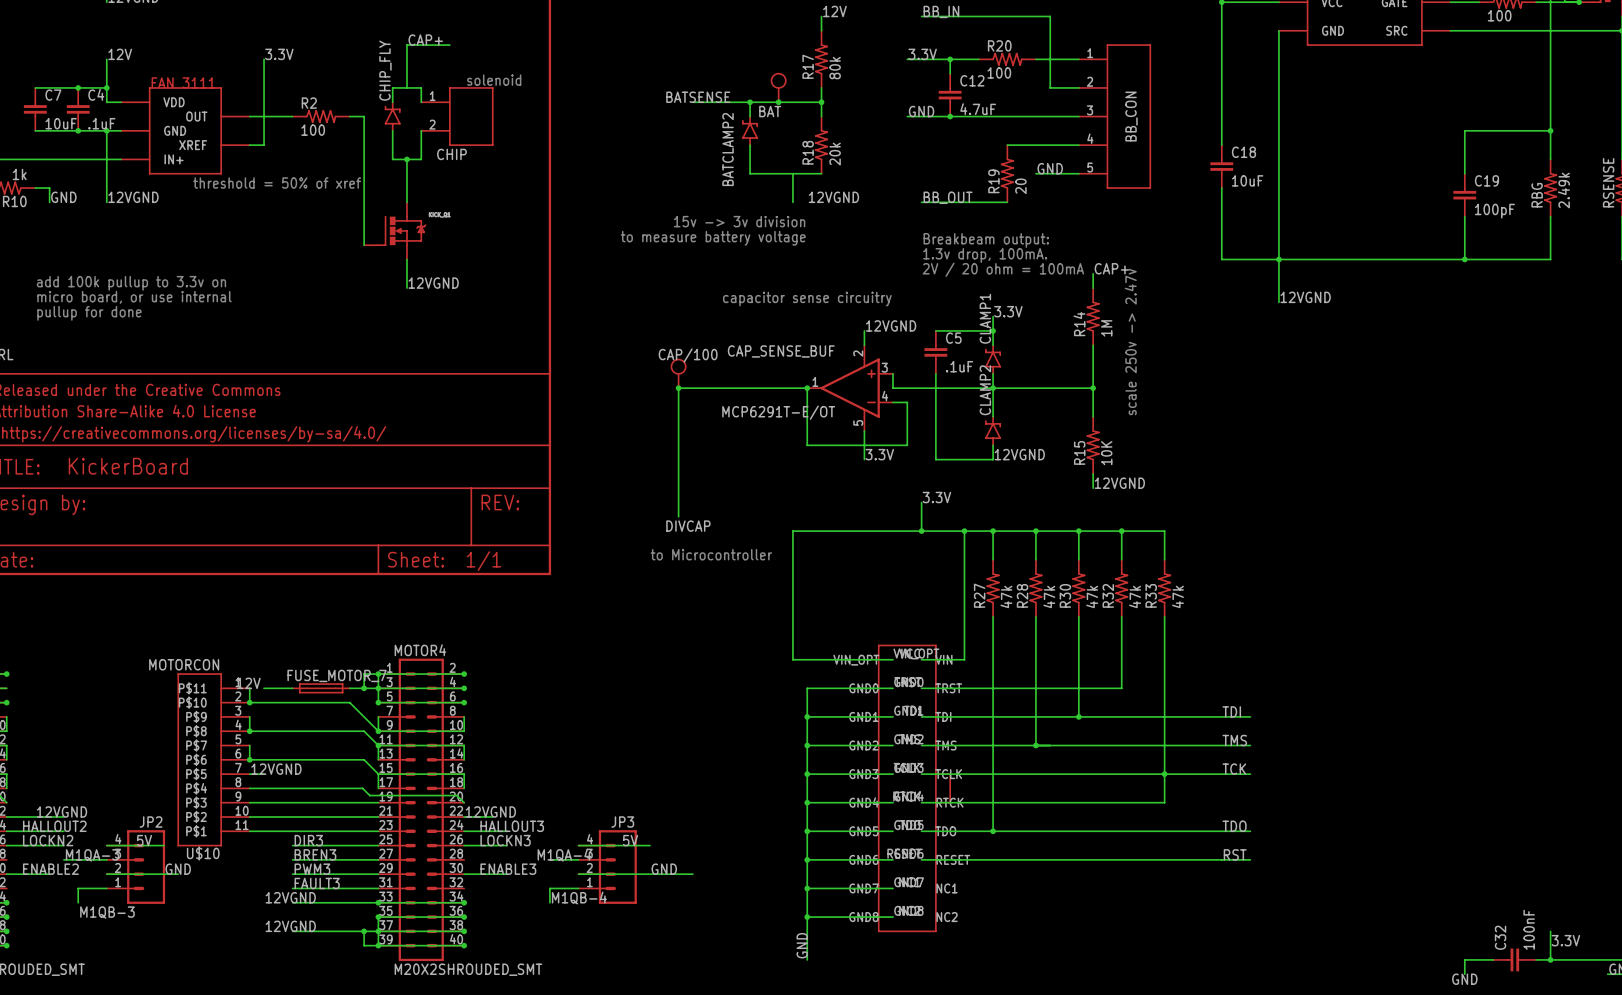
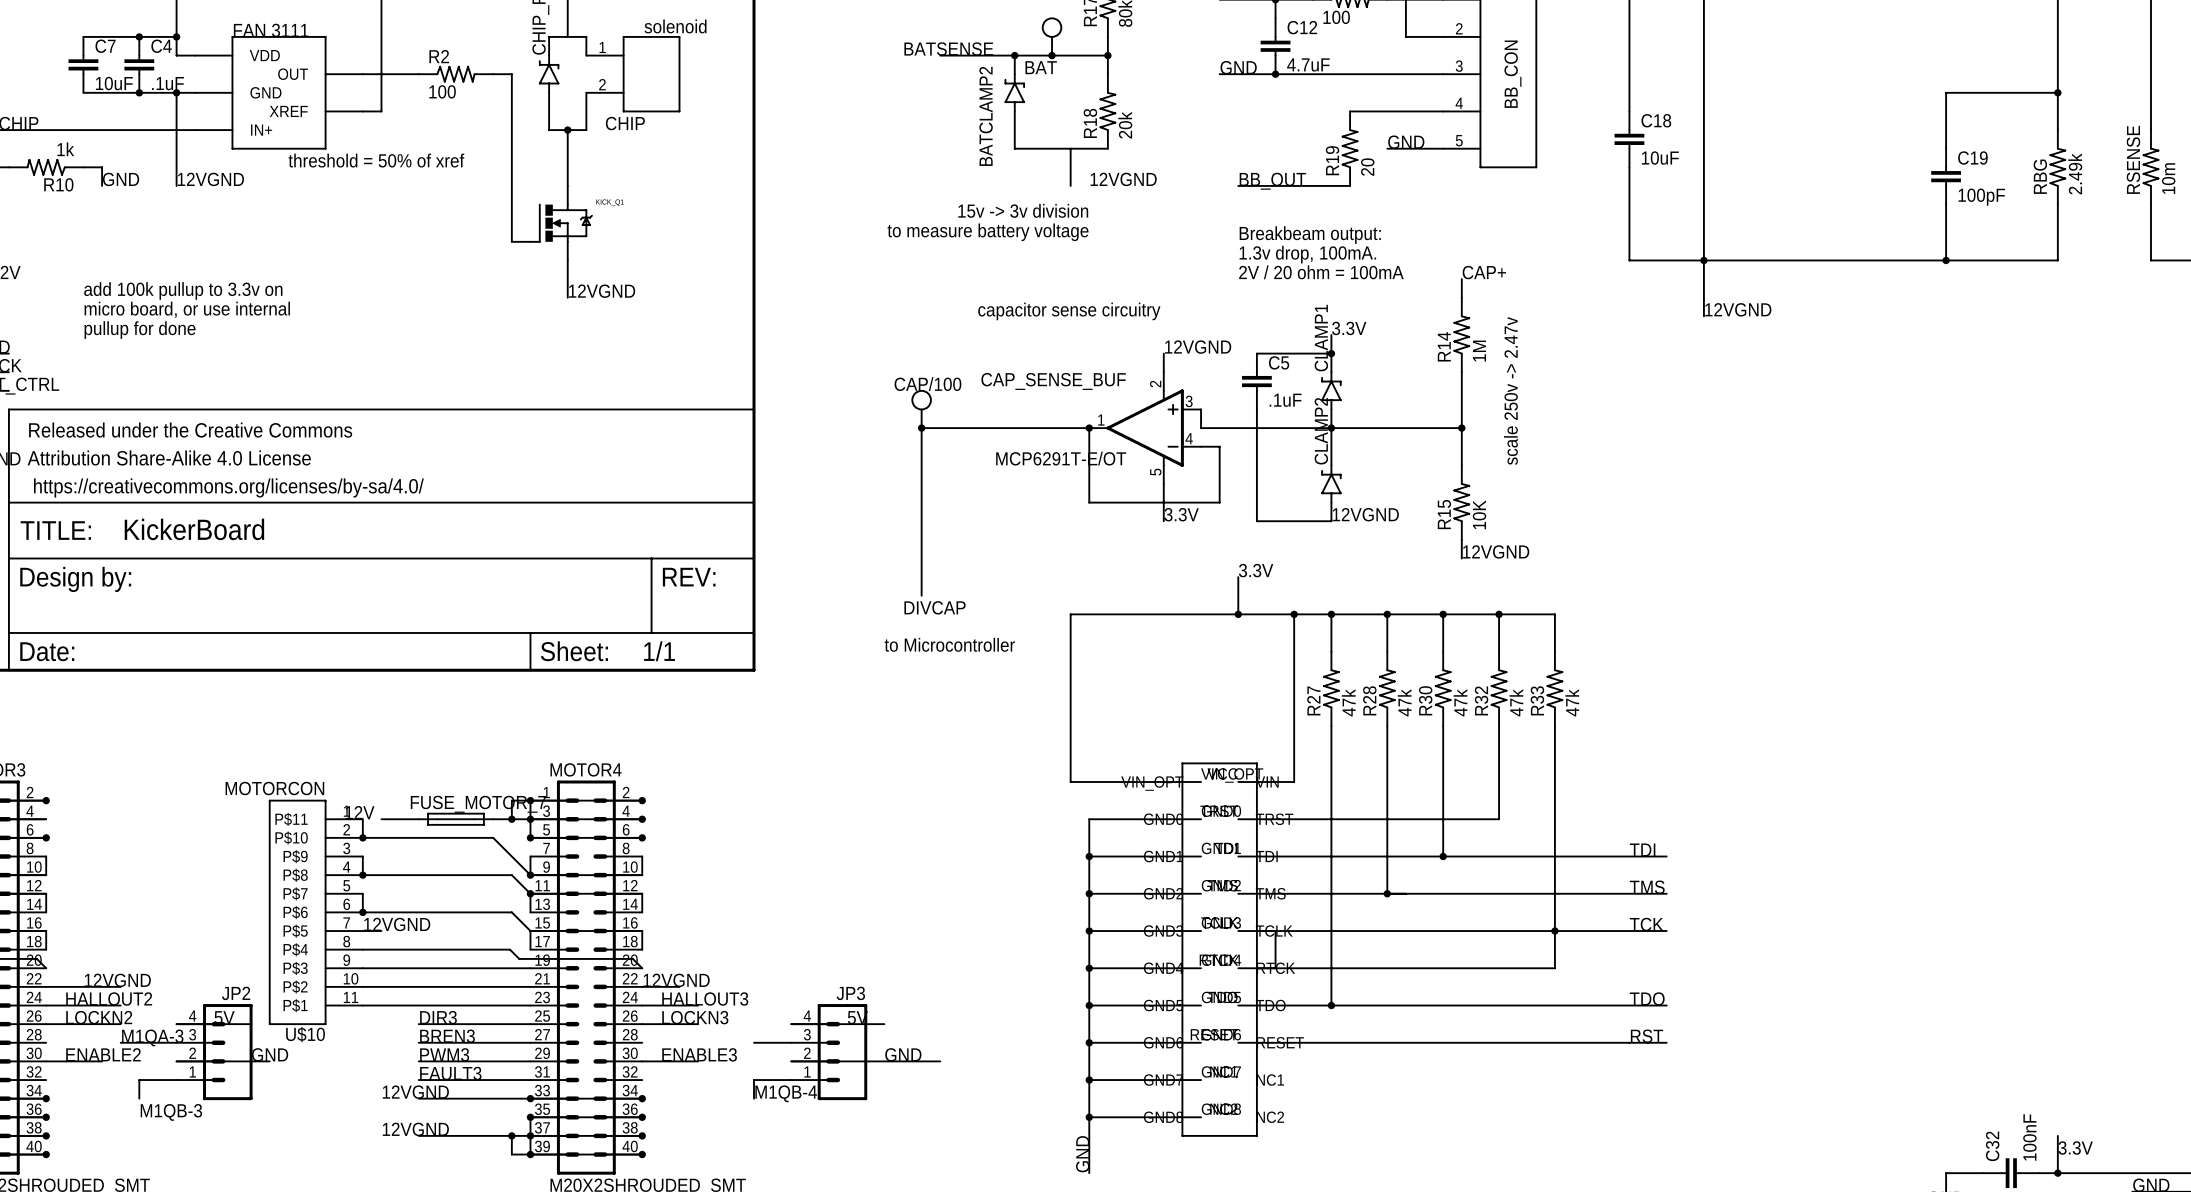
label: M1QA-4 (564, 855) -> none

